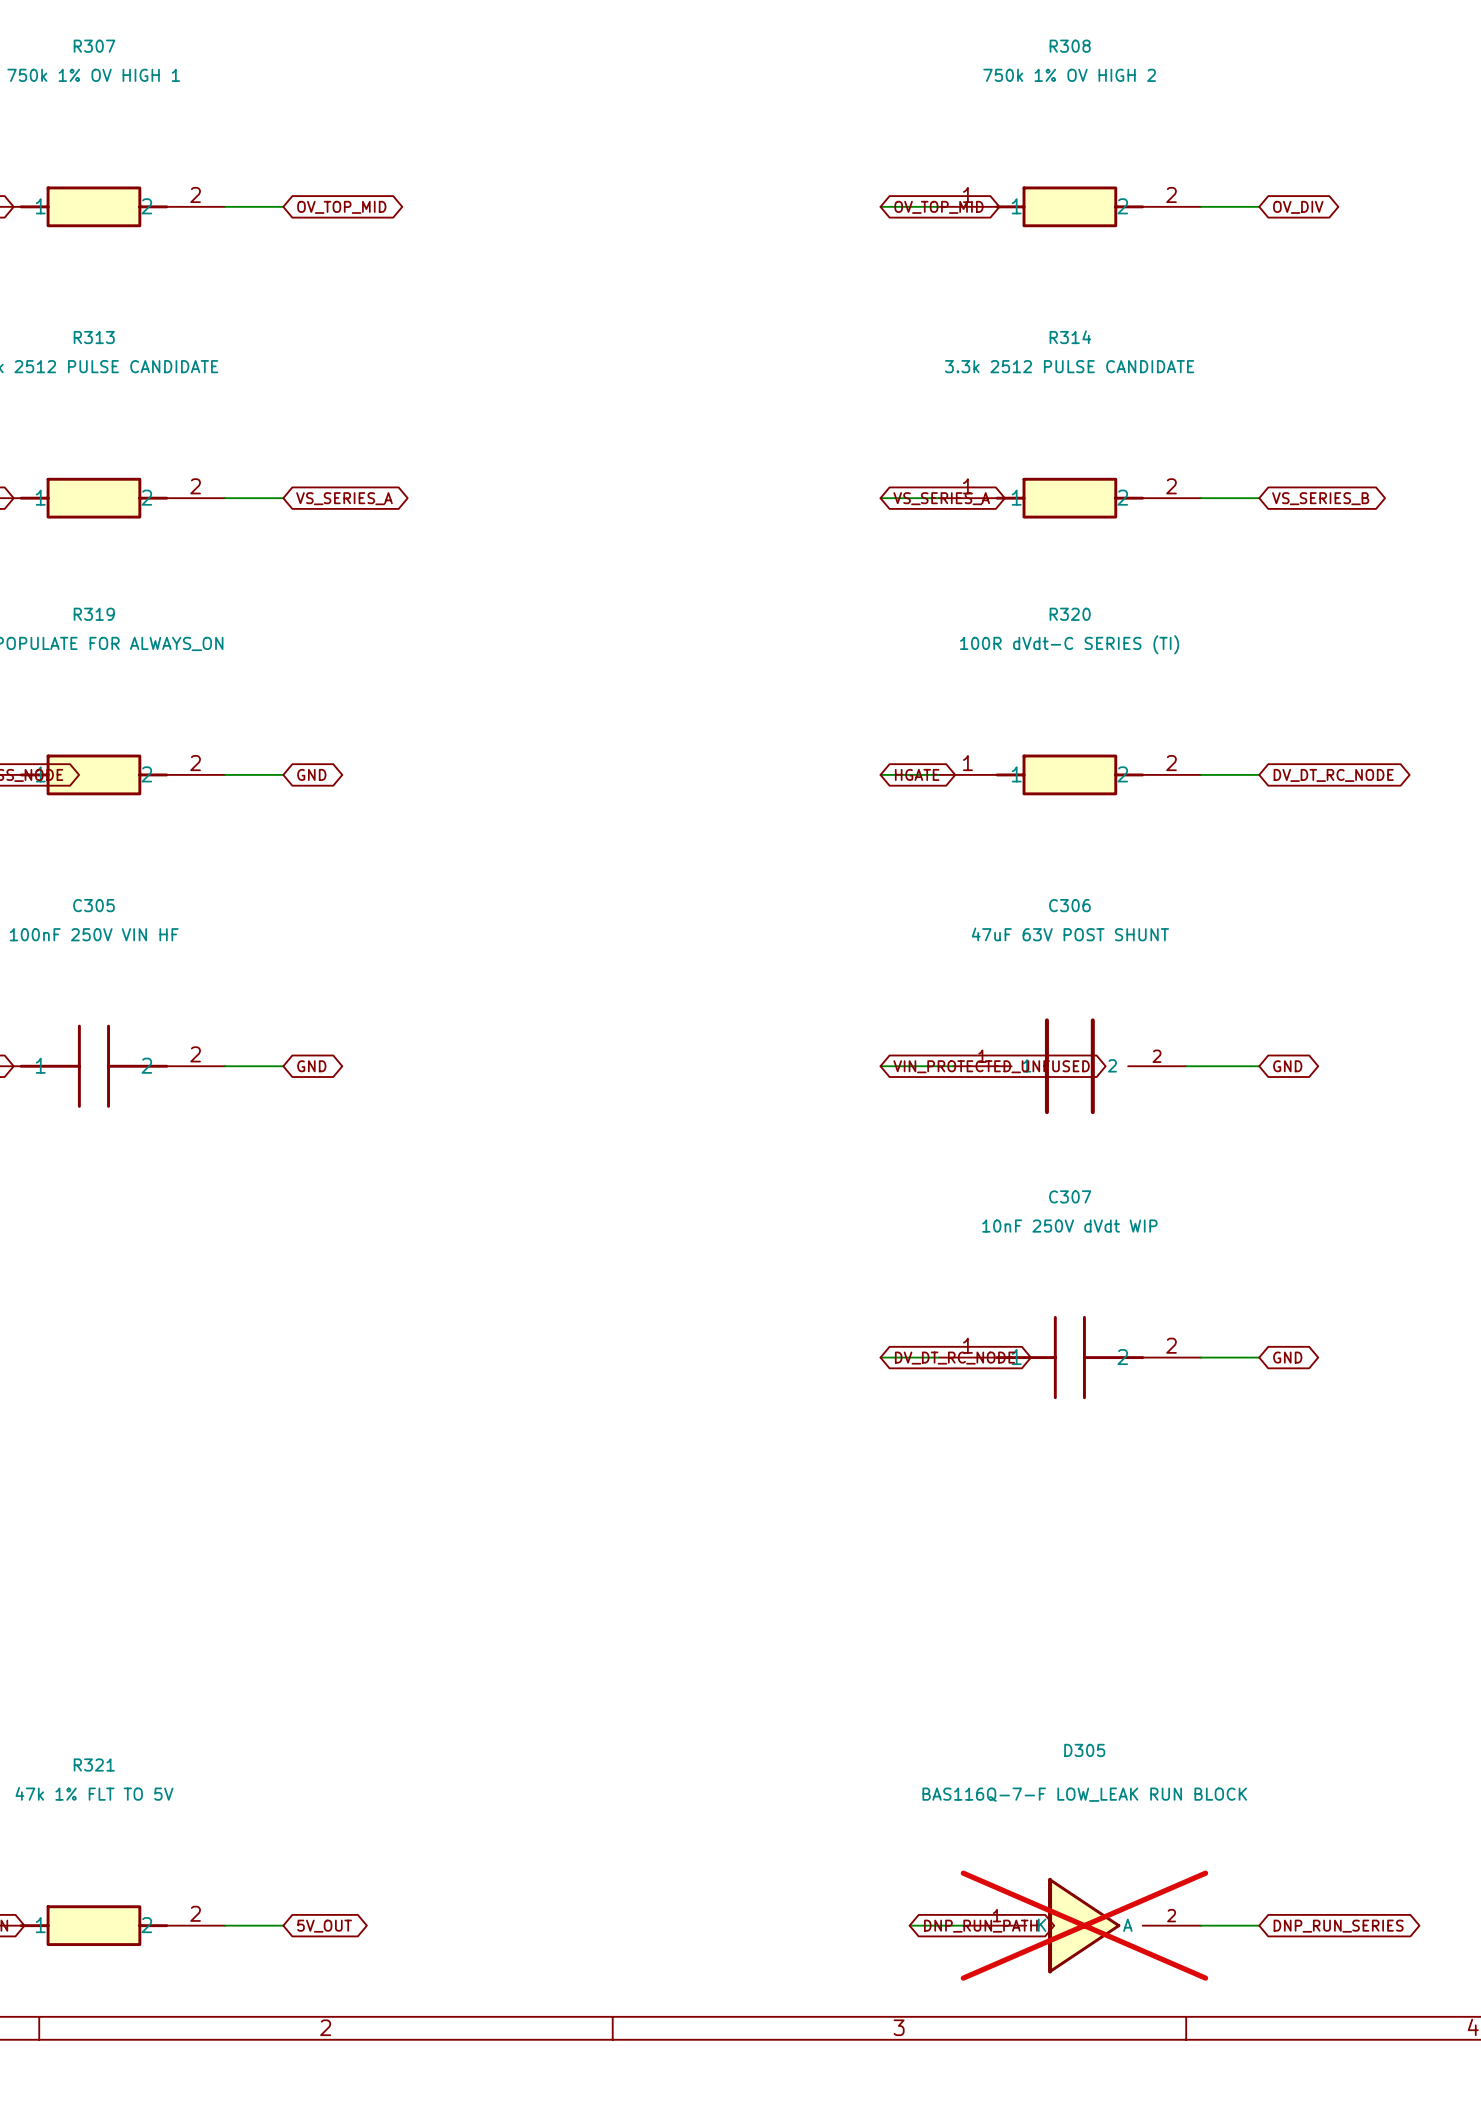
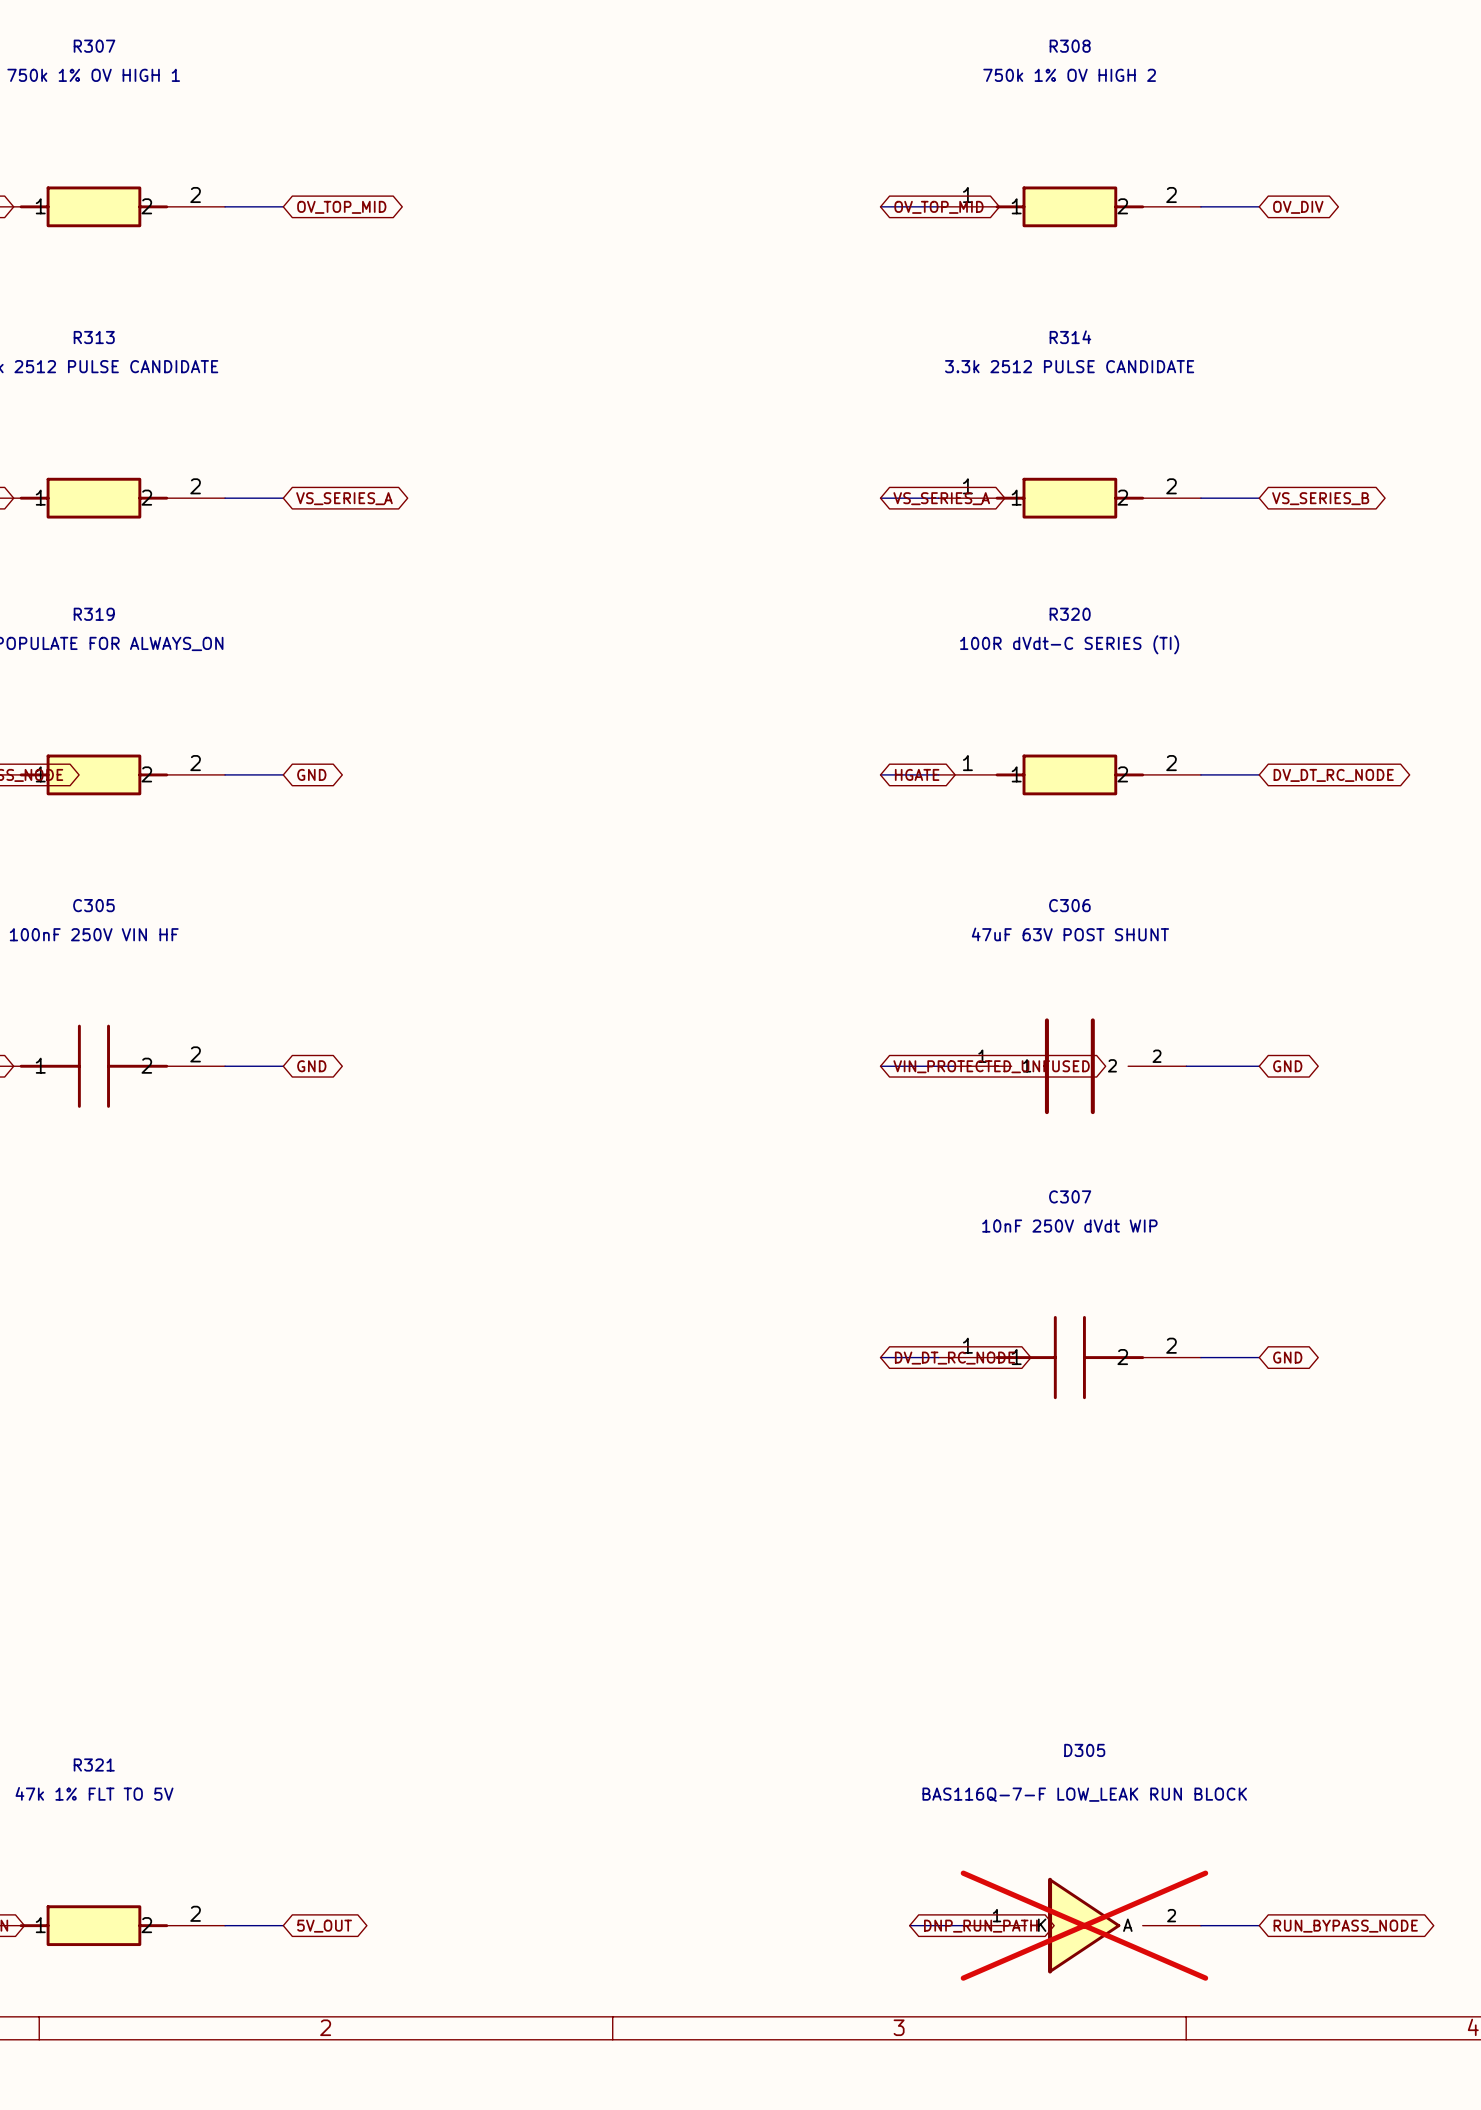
global label: DNP_RUN_SERIES (1338, 1926) -> RUN_BYPASS_NODE (1345, 1926)

